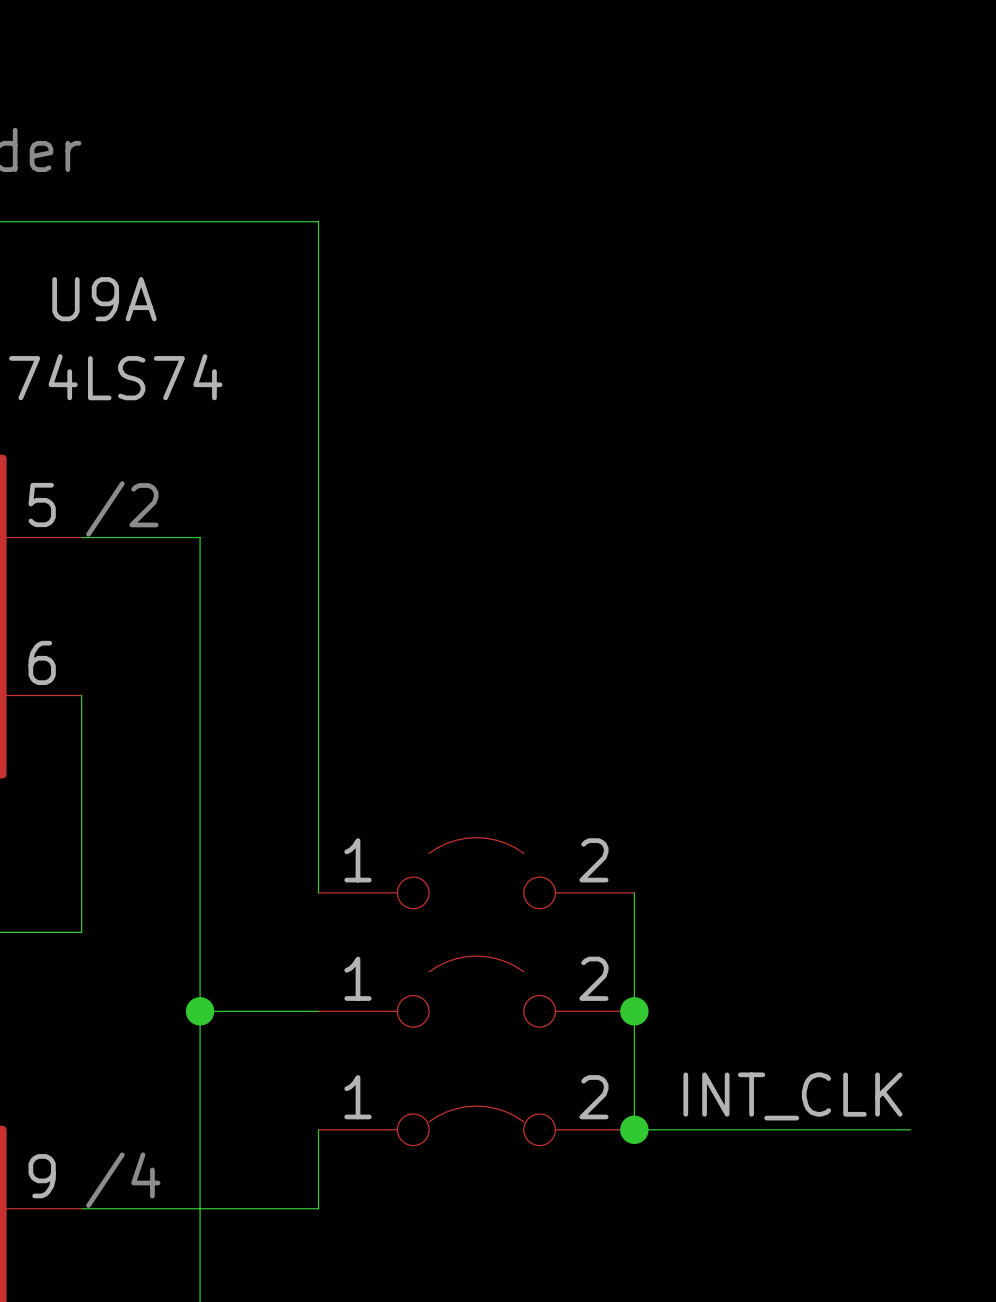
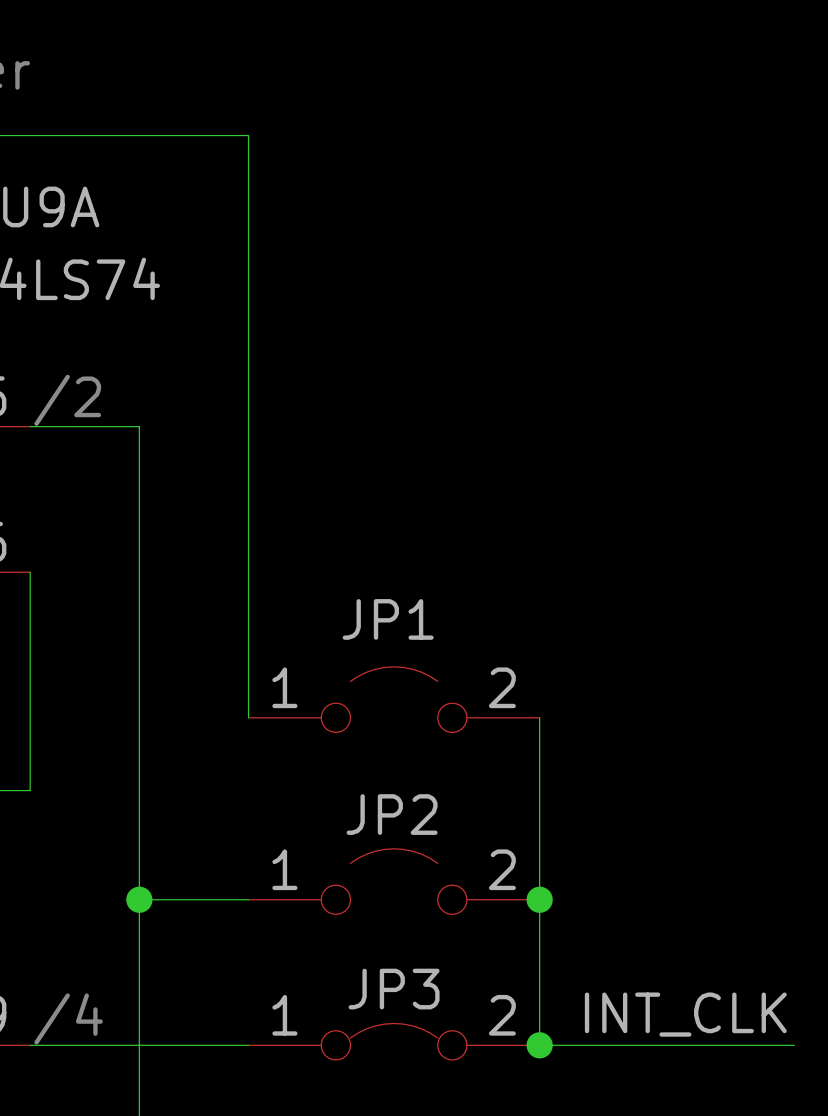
JP1: none -> (394, 699)
wire: (318, 853) (318, 892) -> (539, 717) (539, 754)
part: (476, 873) -> none
part: (476, 991) -> none
wire: (200, 1011) (318, 1011) -> (139, 899) (248, 899)
junction position: (200, 1011) -> (139, 899)
junction: (634, 1011) -> none
JP2: none -> (394, 881)
junction: none -> (539, 899)
label position: INT_CLK (792, 1096) -> INT_CLK (685, 1014)
part: (476, 1125) -> none
wire: (318, 1129) (318, 1208) -> none
wire: (634, 1129) (910, 1129) -> (539, 972) (539, 1045) (794, 1045)
junction: (634, 1129) -> none
JP3: none -> (394, 1041)
junction: none -> (539, 1045)

